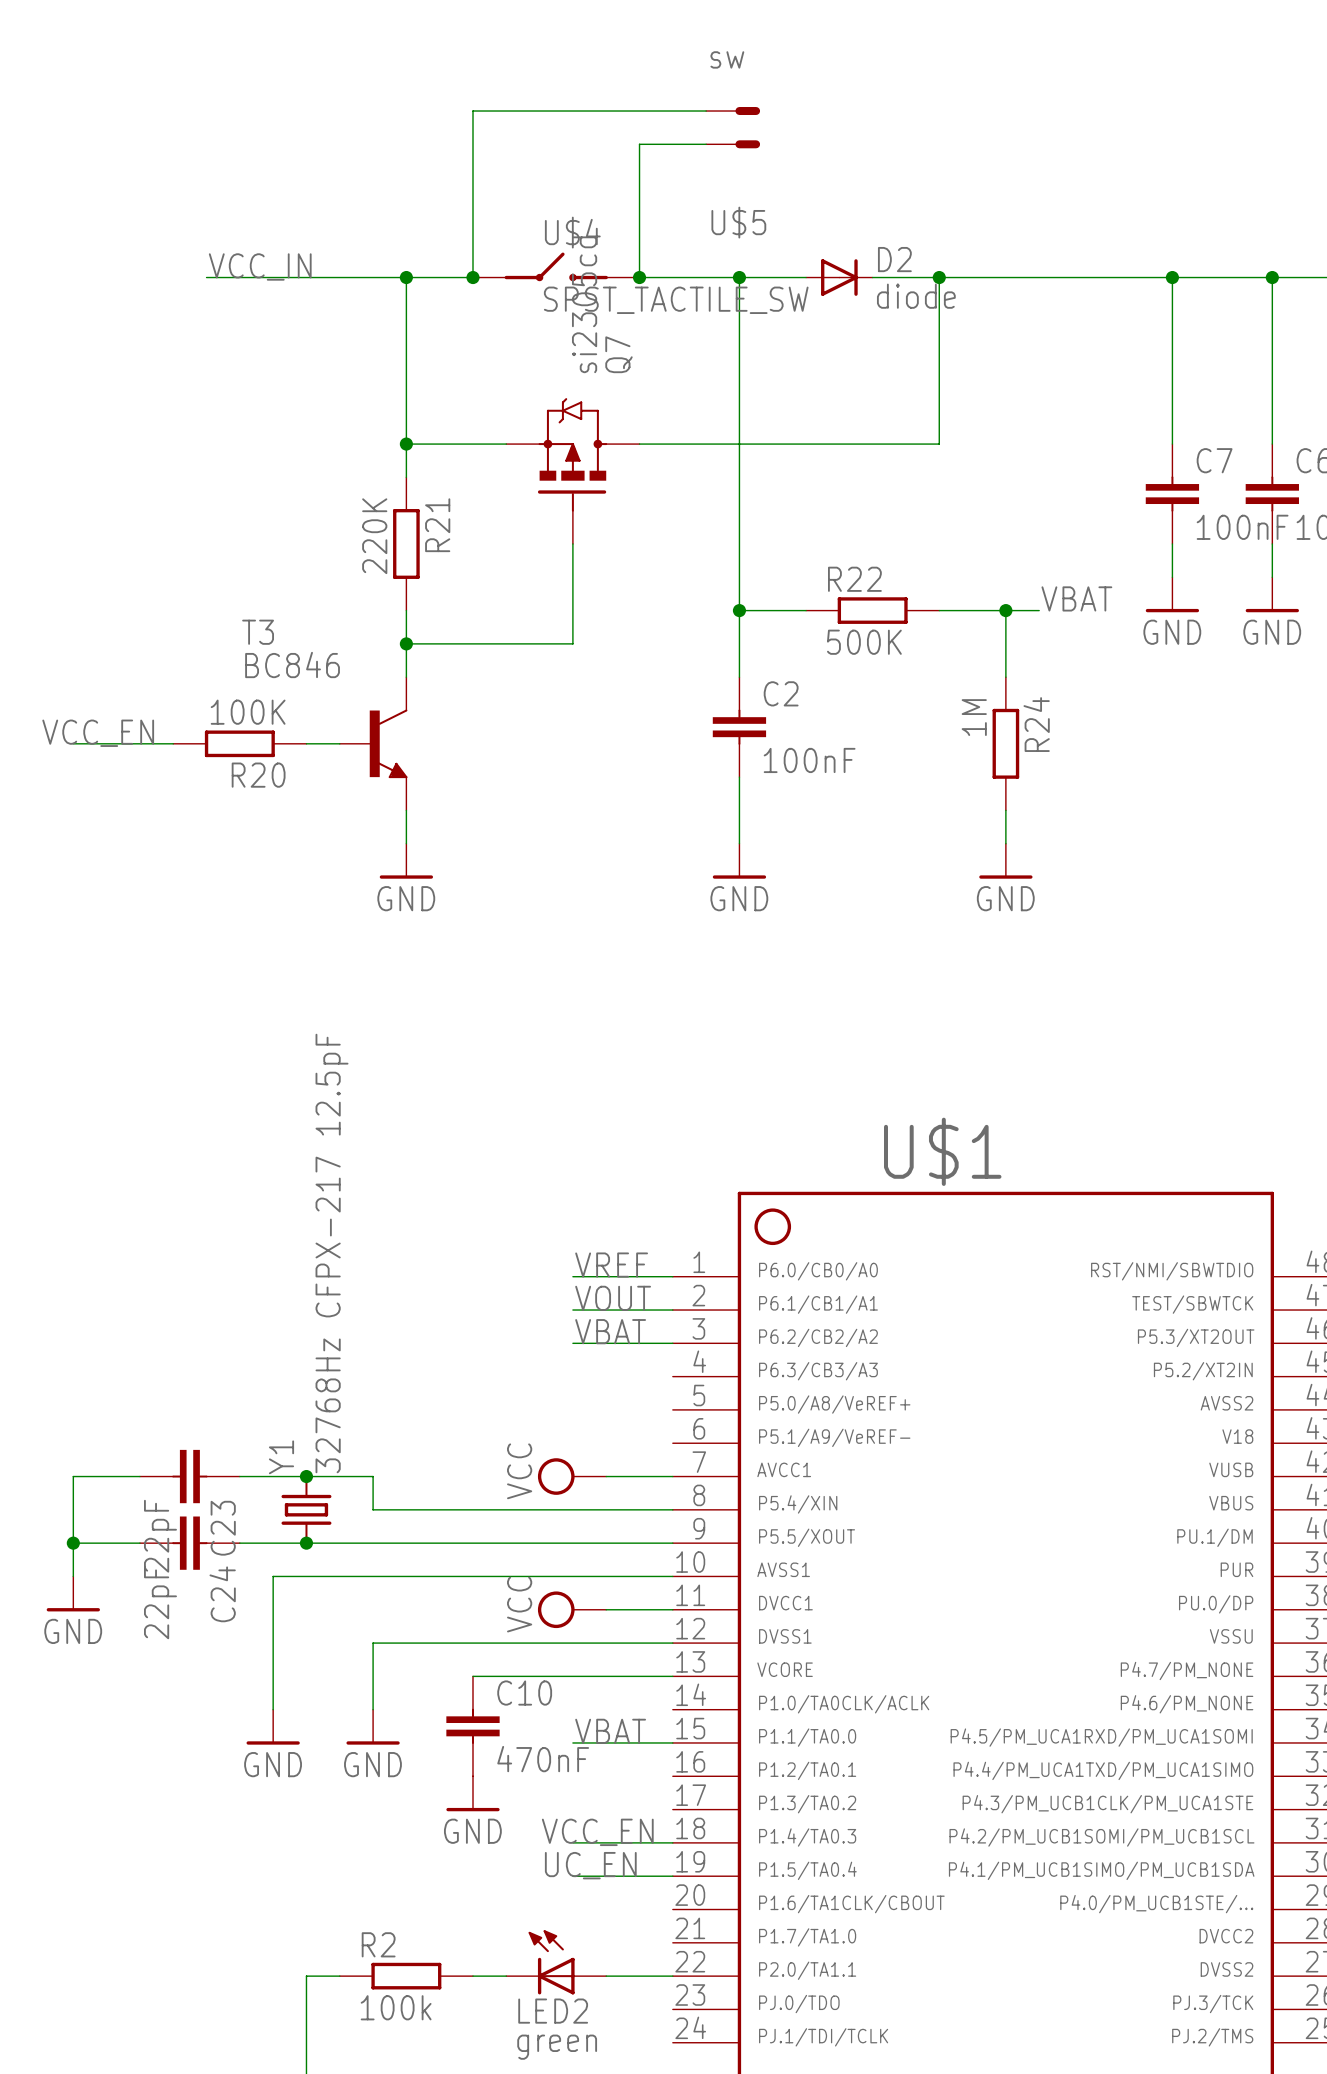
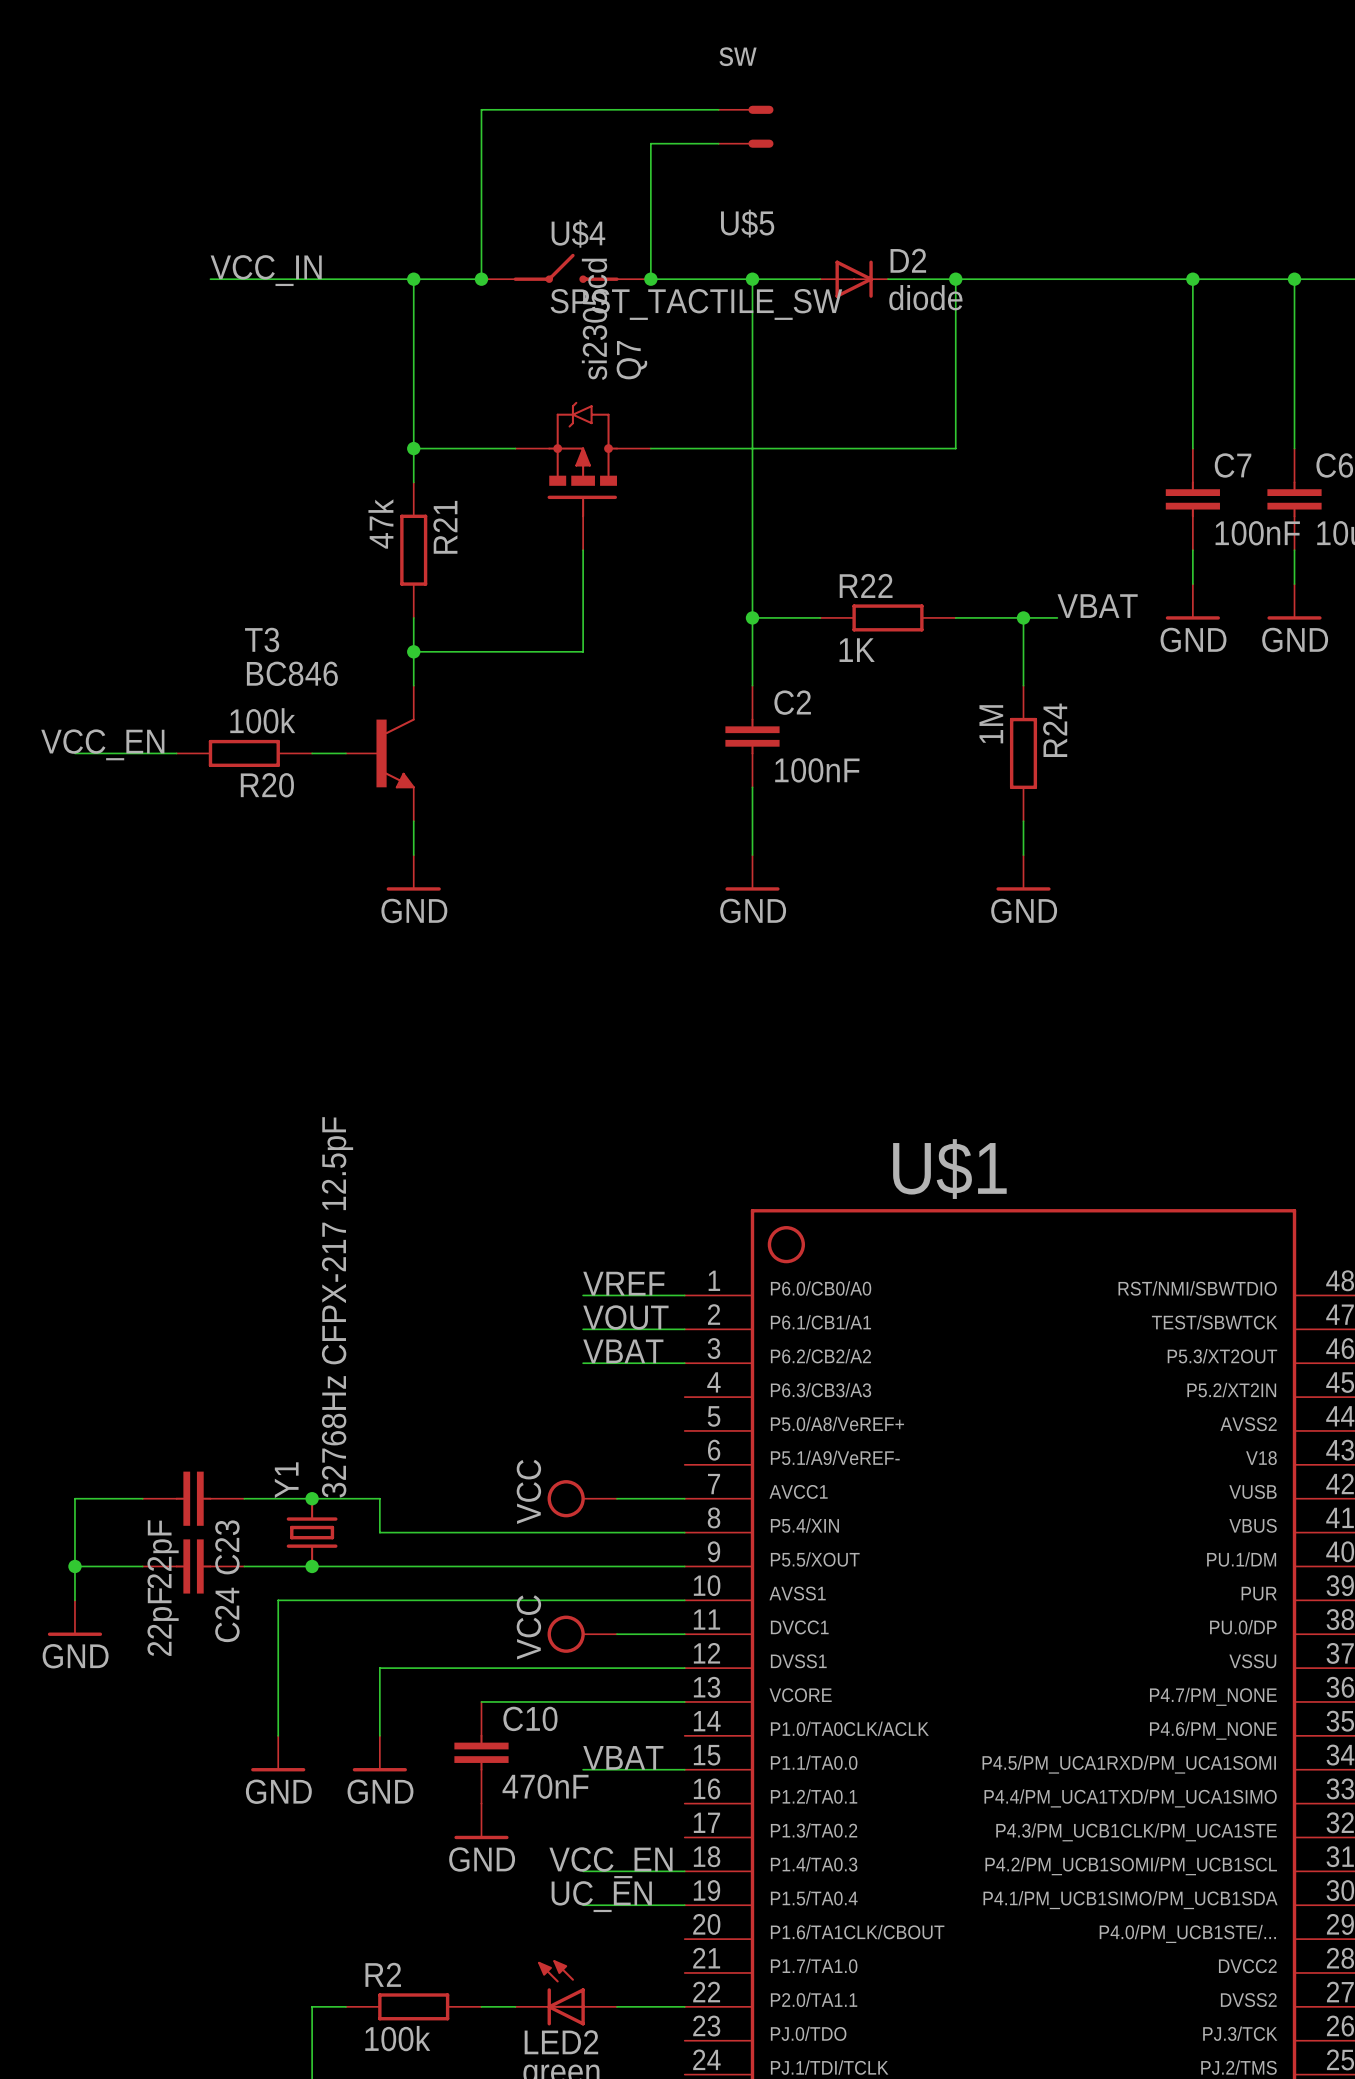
R21 value: 220K (374, 536) -> 47k (380, 524)
R22 value: 500K (864, 642) -> 1K (857, 650)
R20 value: 100K (248, 712) -> 100k (262, 720)

